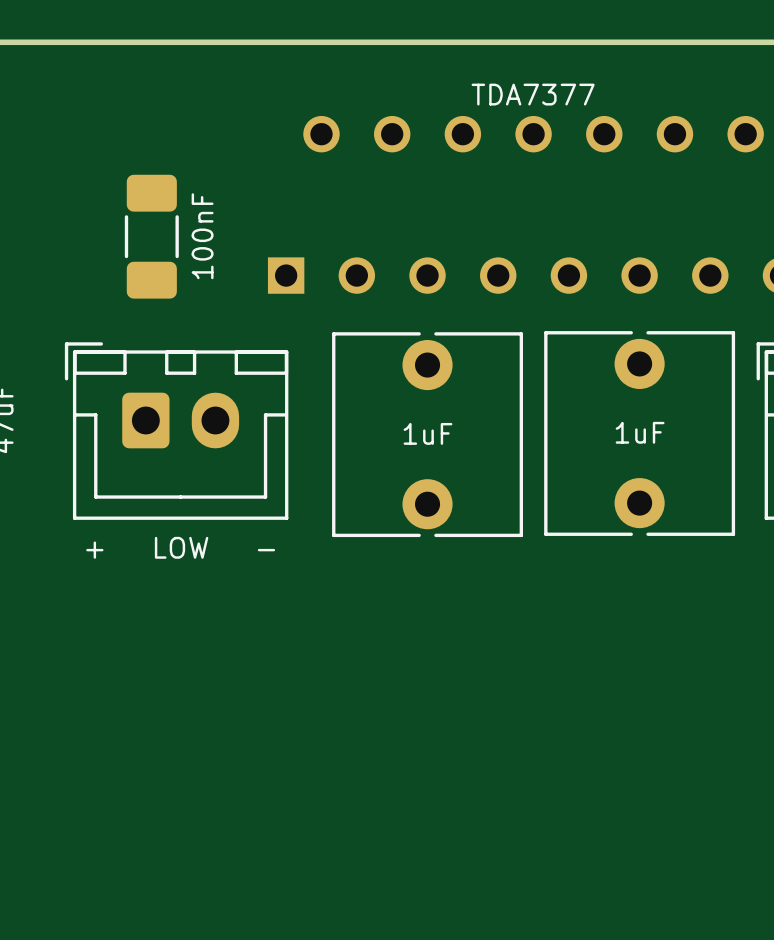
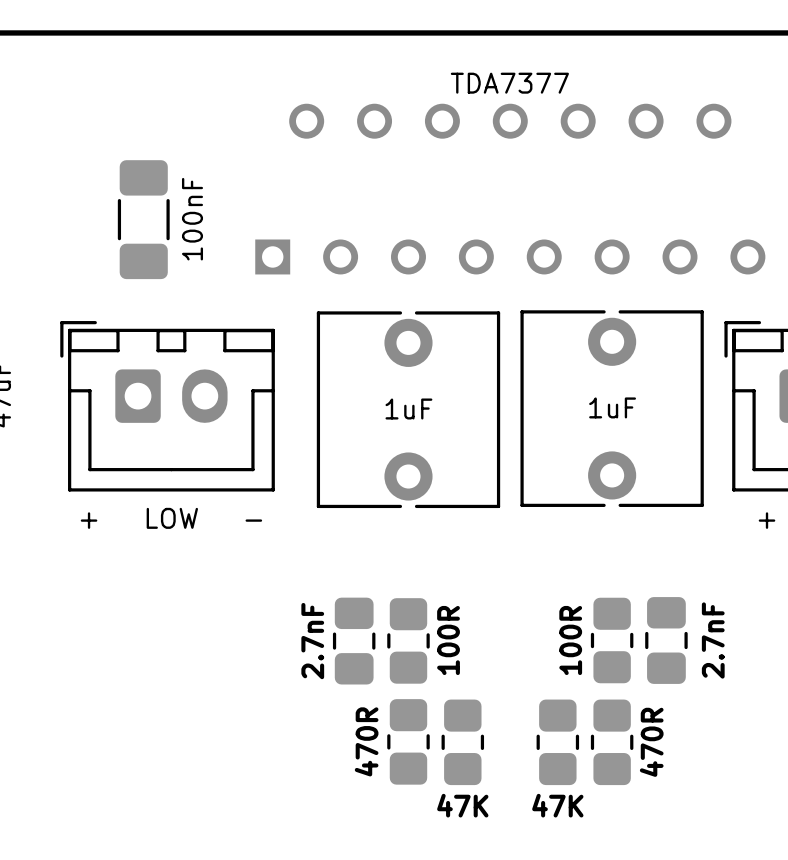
part: none -> 2.7nF (354, 641)
part: none -> 100R (408, 640)
part: none -> 100R (612, 640)
part: none -> 2.7nF (666, 640)
part: none -> 470R (408, 741)
part: none -> 47K (462, 742)
part: none -> 47K (557, 742)
part: none -> 470R (612, 742)

